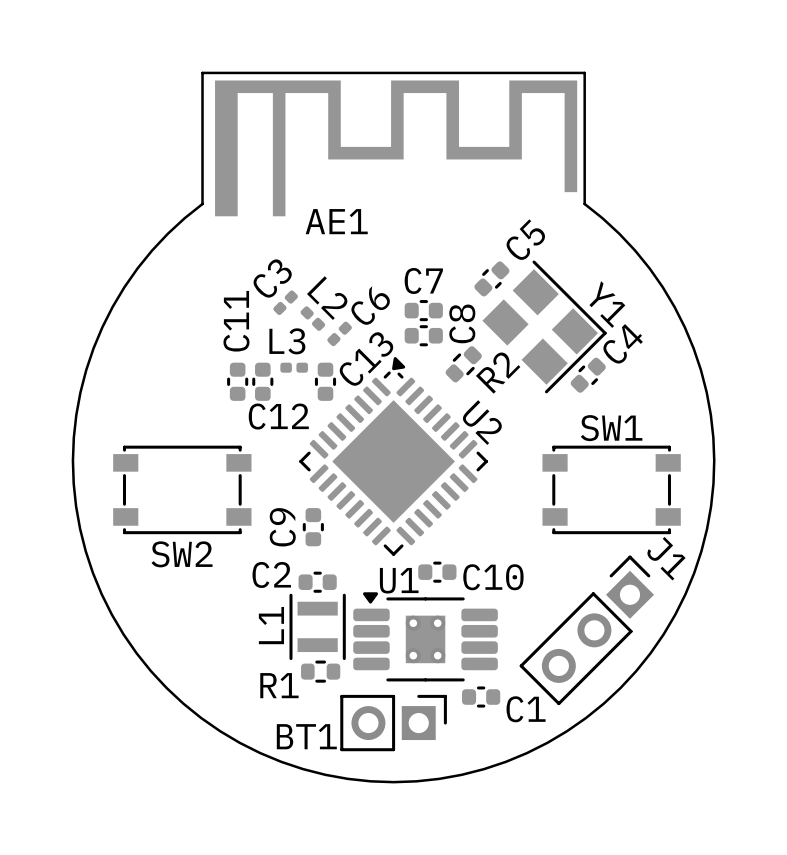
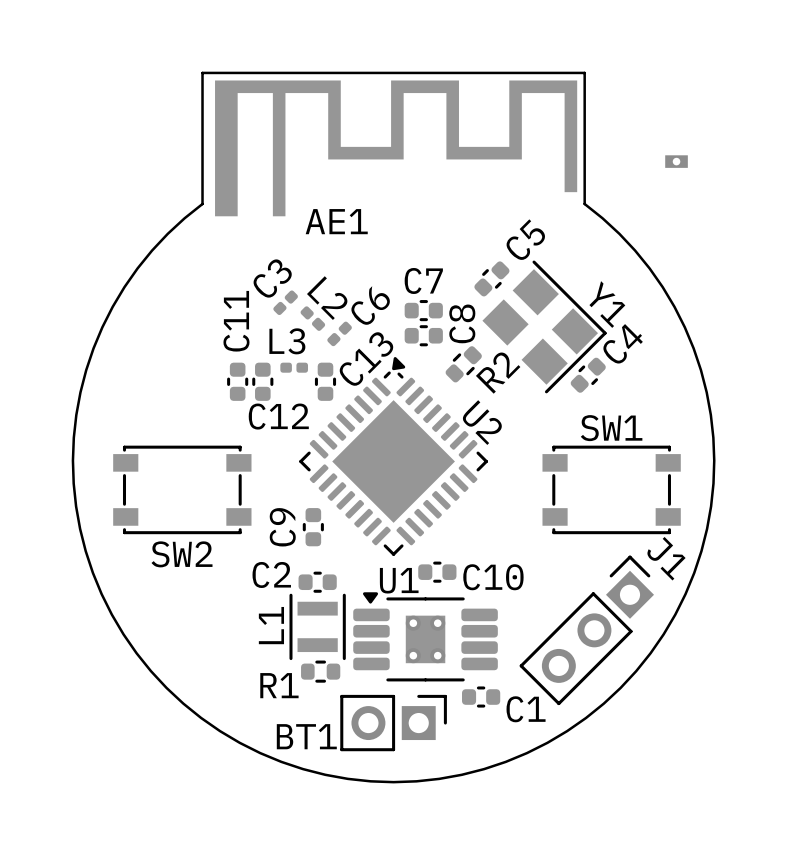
part: none -> (676, 161)

